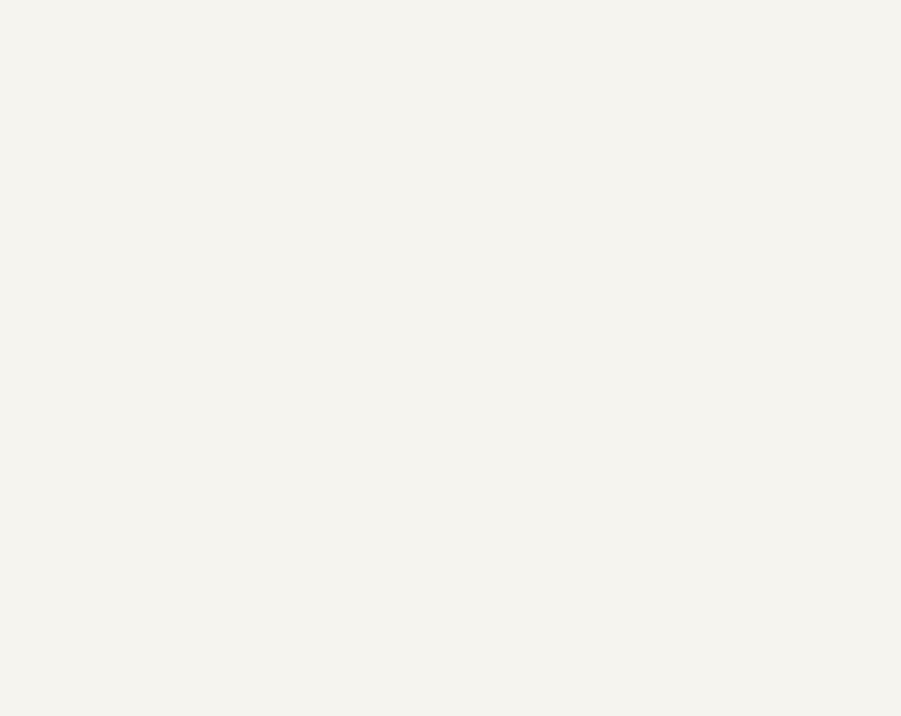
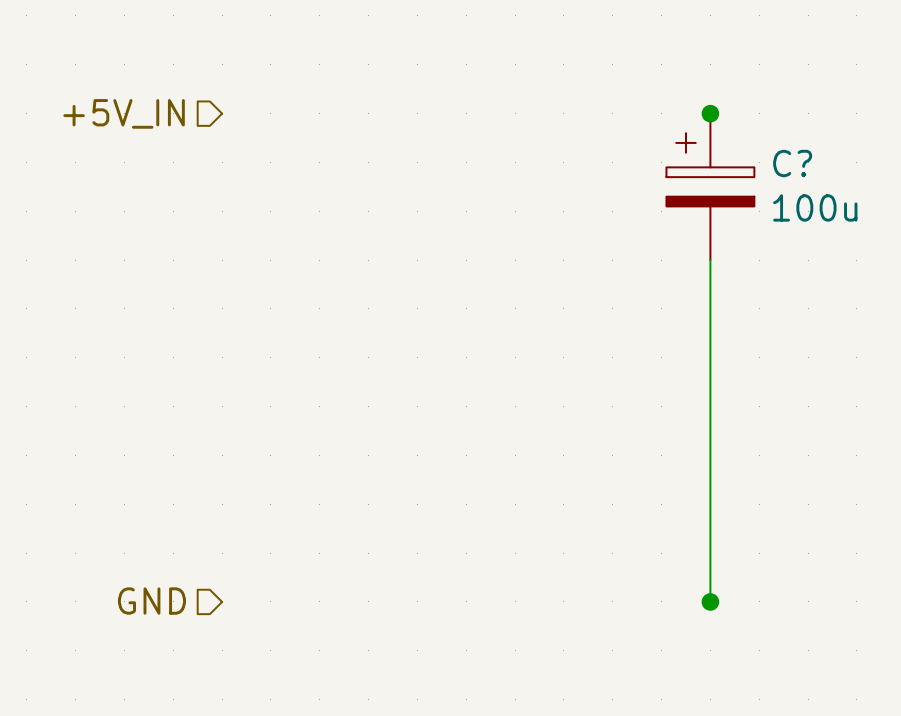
junction: none -> (710, 113)
hierarchical label: none -> +5V_IN (124, 113)
C?: none -> 100u (710, 186)
wire: none -> (710, 260) (710, 601)
hierarchical label: none -> GND (151, 601)
junction: none -> (710, 601)

